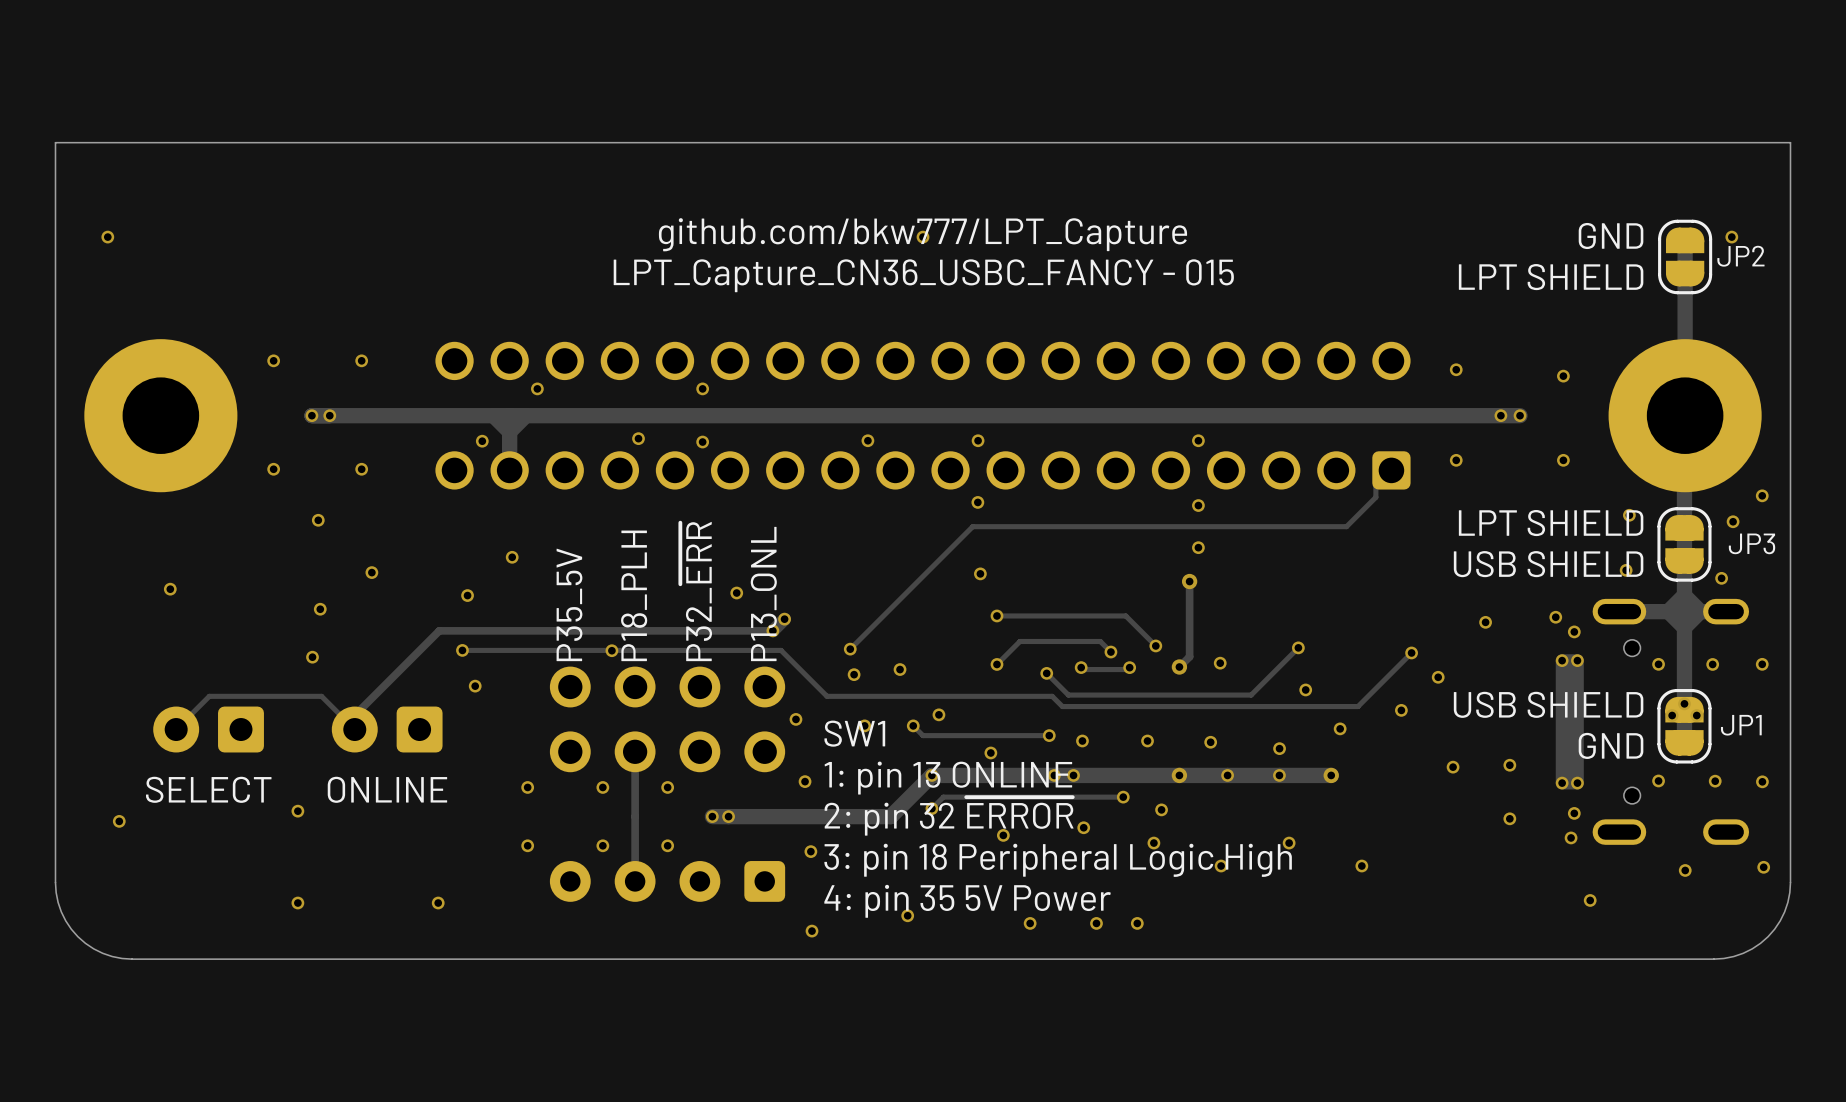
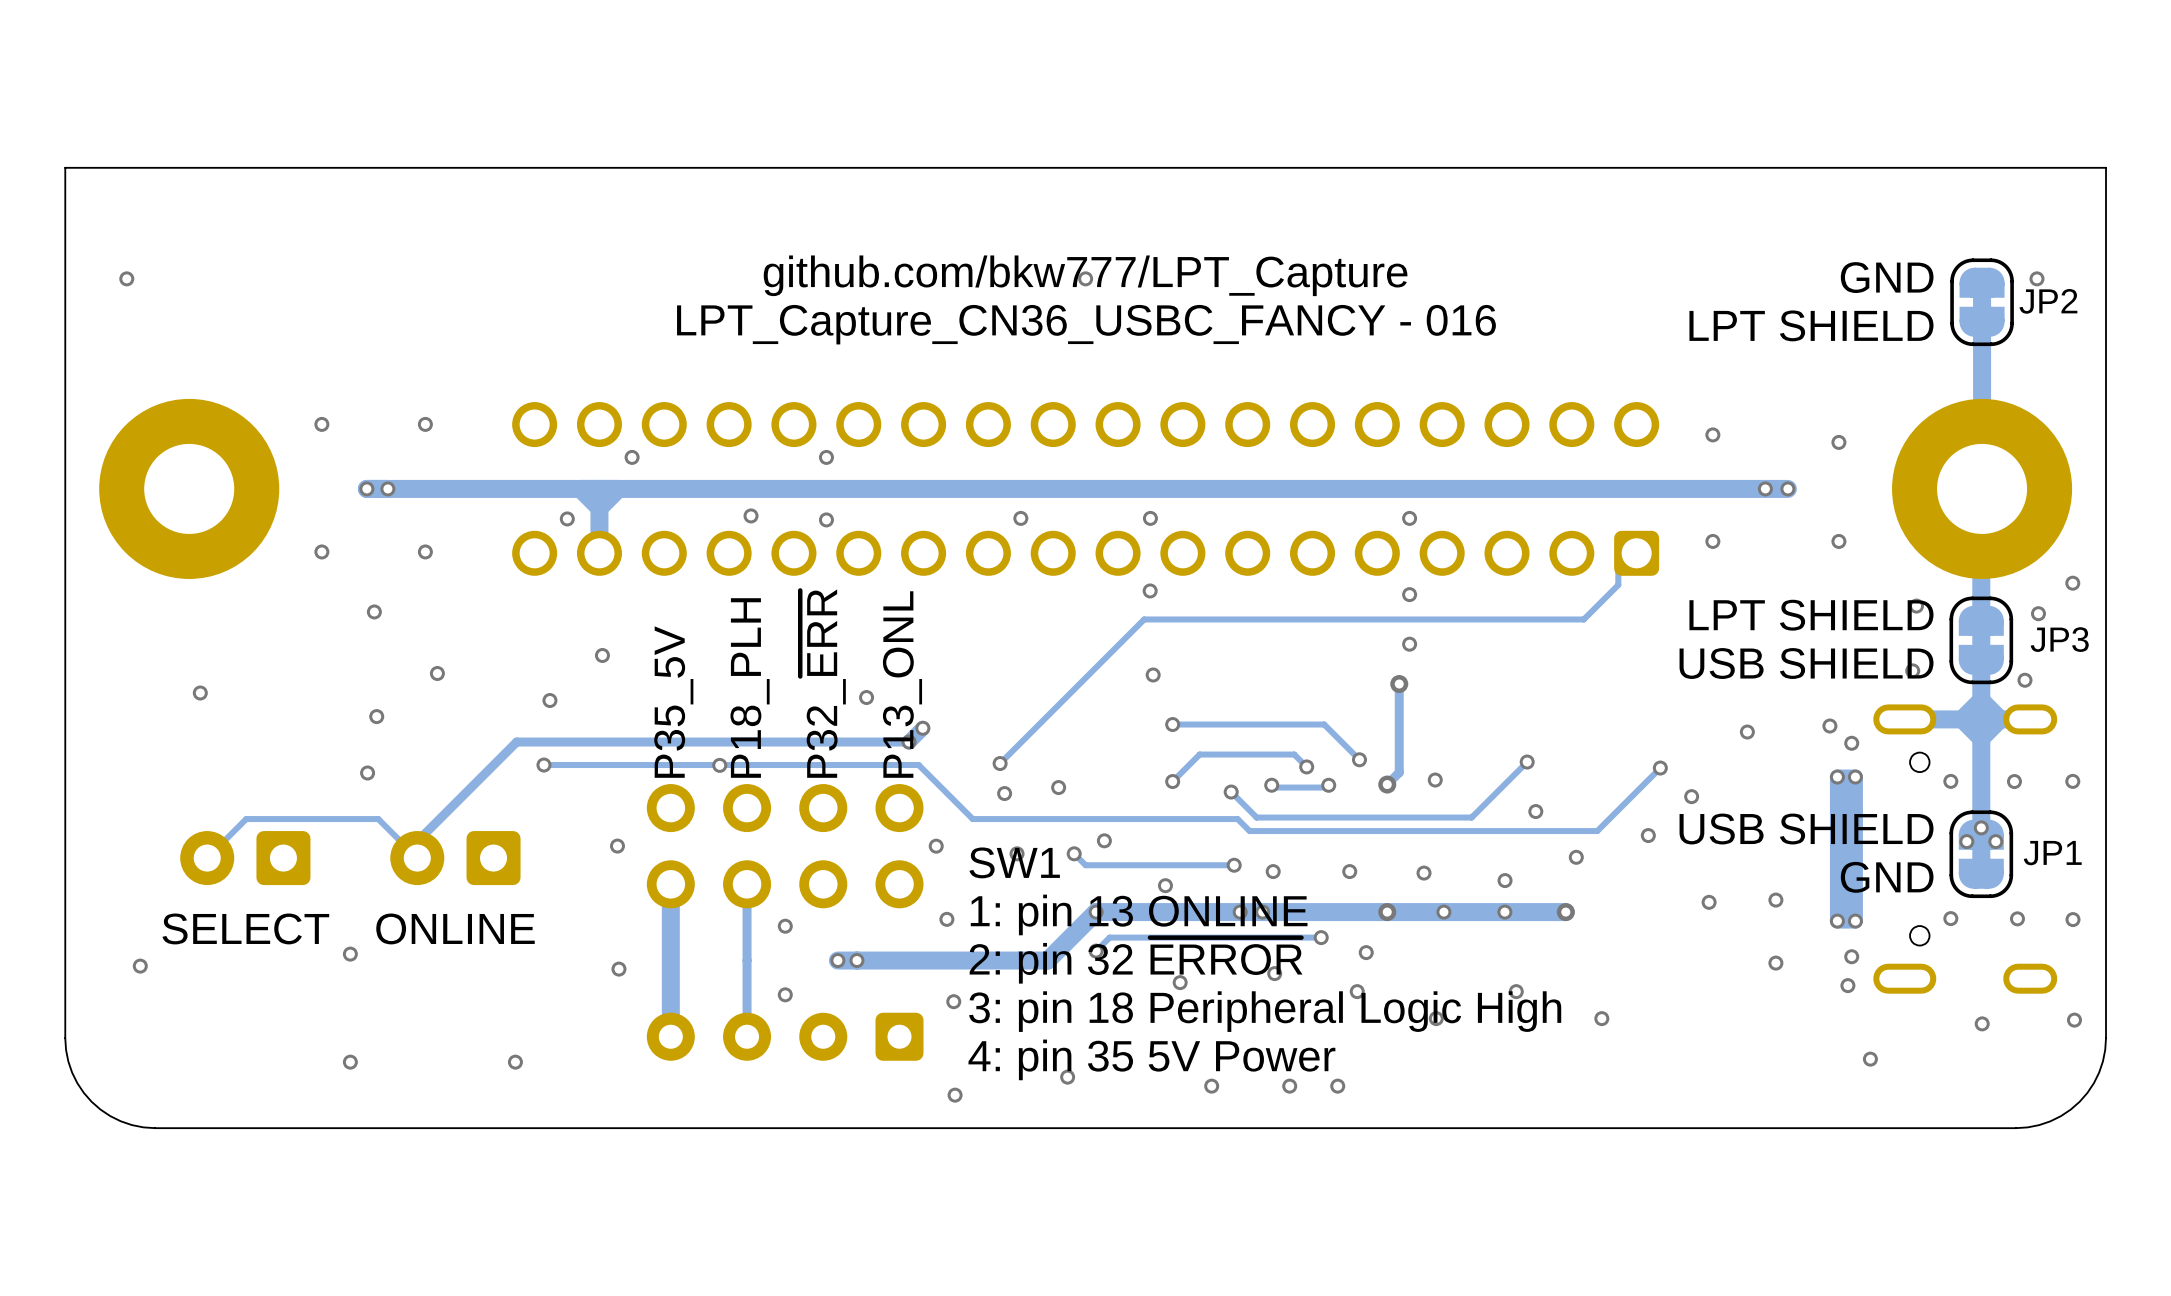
text: LPT_Capture_CN36_USBC_FANCY - 015 (923, 275) -> LPT_Capture_CN36_USBC_FANCY - 016 (1086, 324)
via: (475, 686) -> none
via: none -> (617, 846)
track: none -> (670, 884) (670, 1036)
via: (527, 787) -> none
via: (602, 787) -> none
via: none -> (618, 969)
via: (527, 845) -> none
via: (602, 845) -> none

